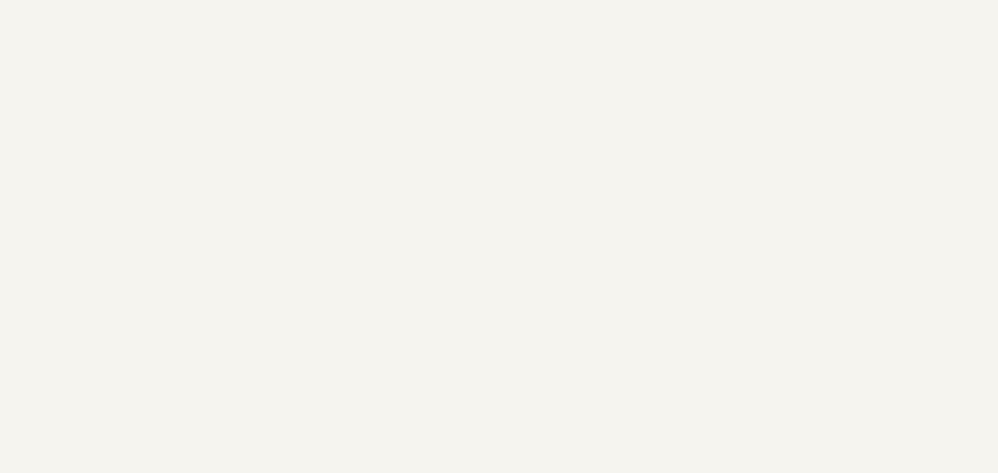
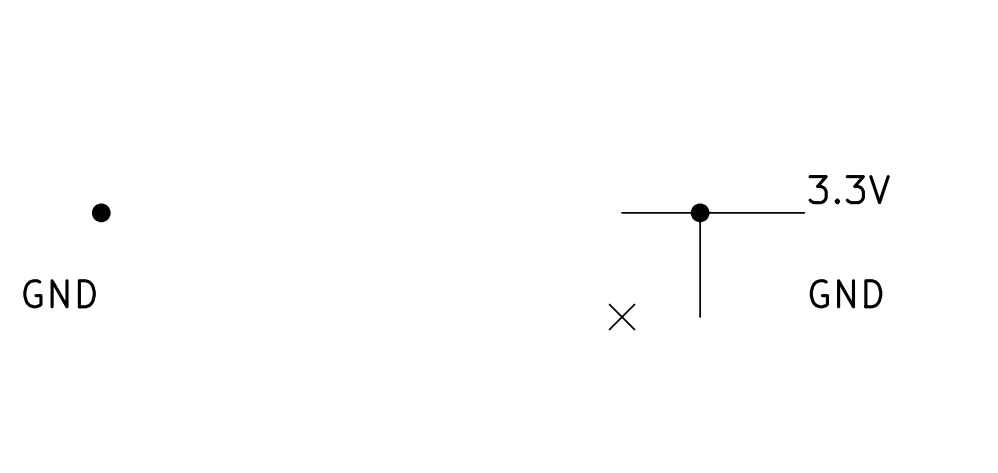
label: none -> 3.3V (849, 189)
junction: none -> (101, 212)
wire: none -> (622, 212) (804, 212)
wire: none -> (700, 212) (700, 317)
junction: none -> (700, 212)
label: none -> GND (59, 293)
label: none -> GND (846, 293)
no-connect mark: none -> (622, 317)

